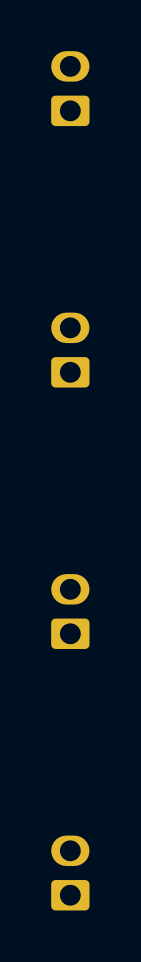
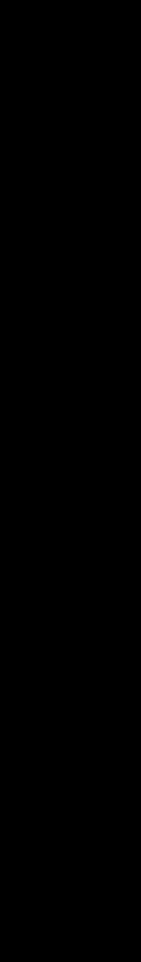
part: (70, 88) -> none
part: (70, 350) -> none
part: (70, 611) -> none
part: (70, 873) -> none

